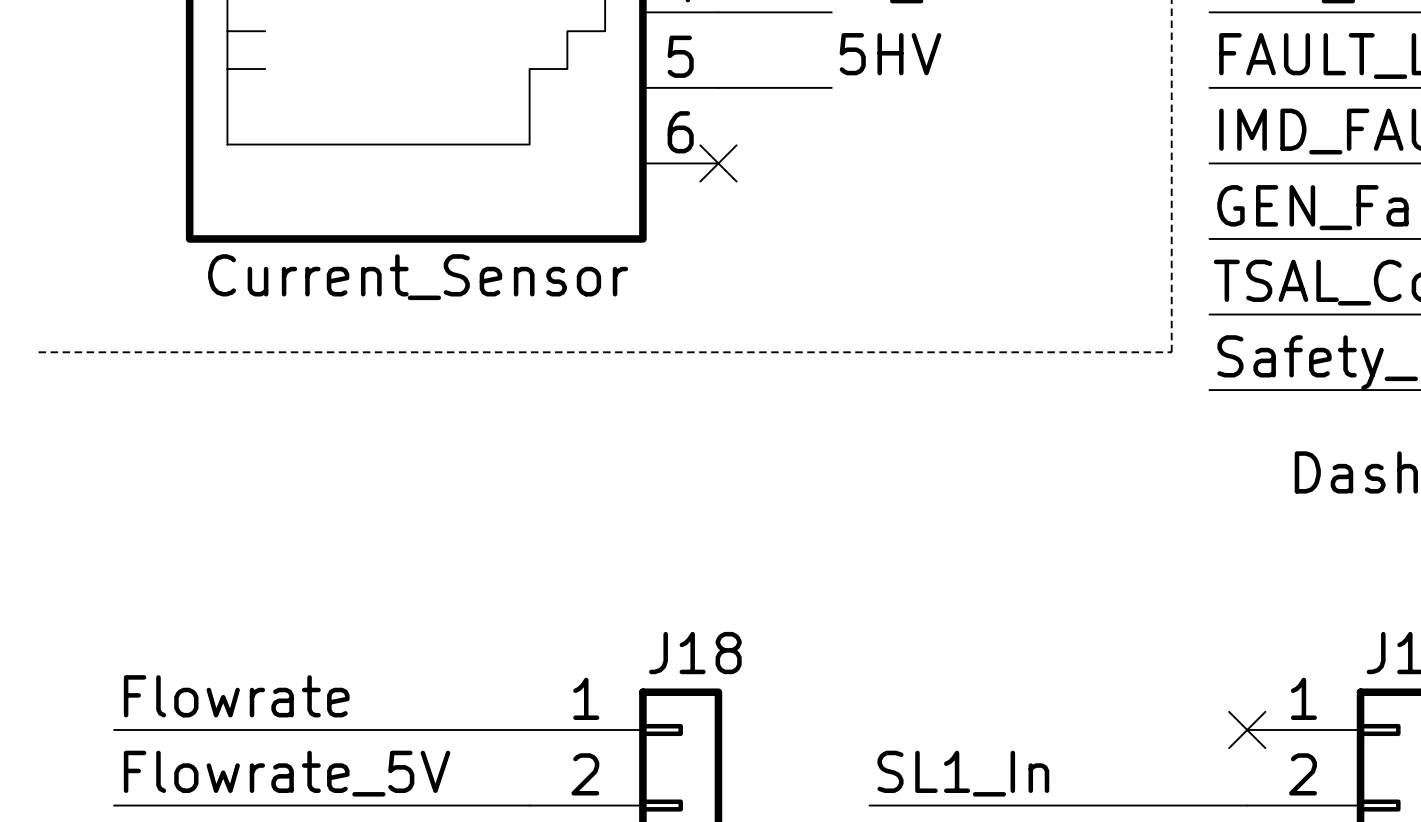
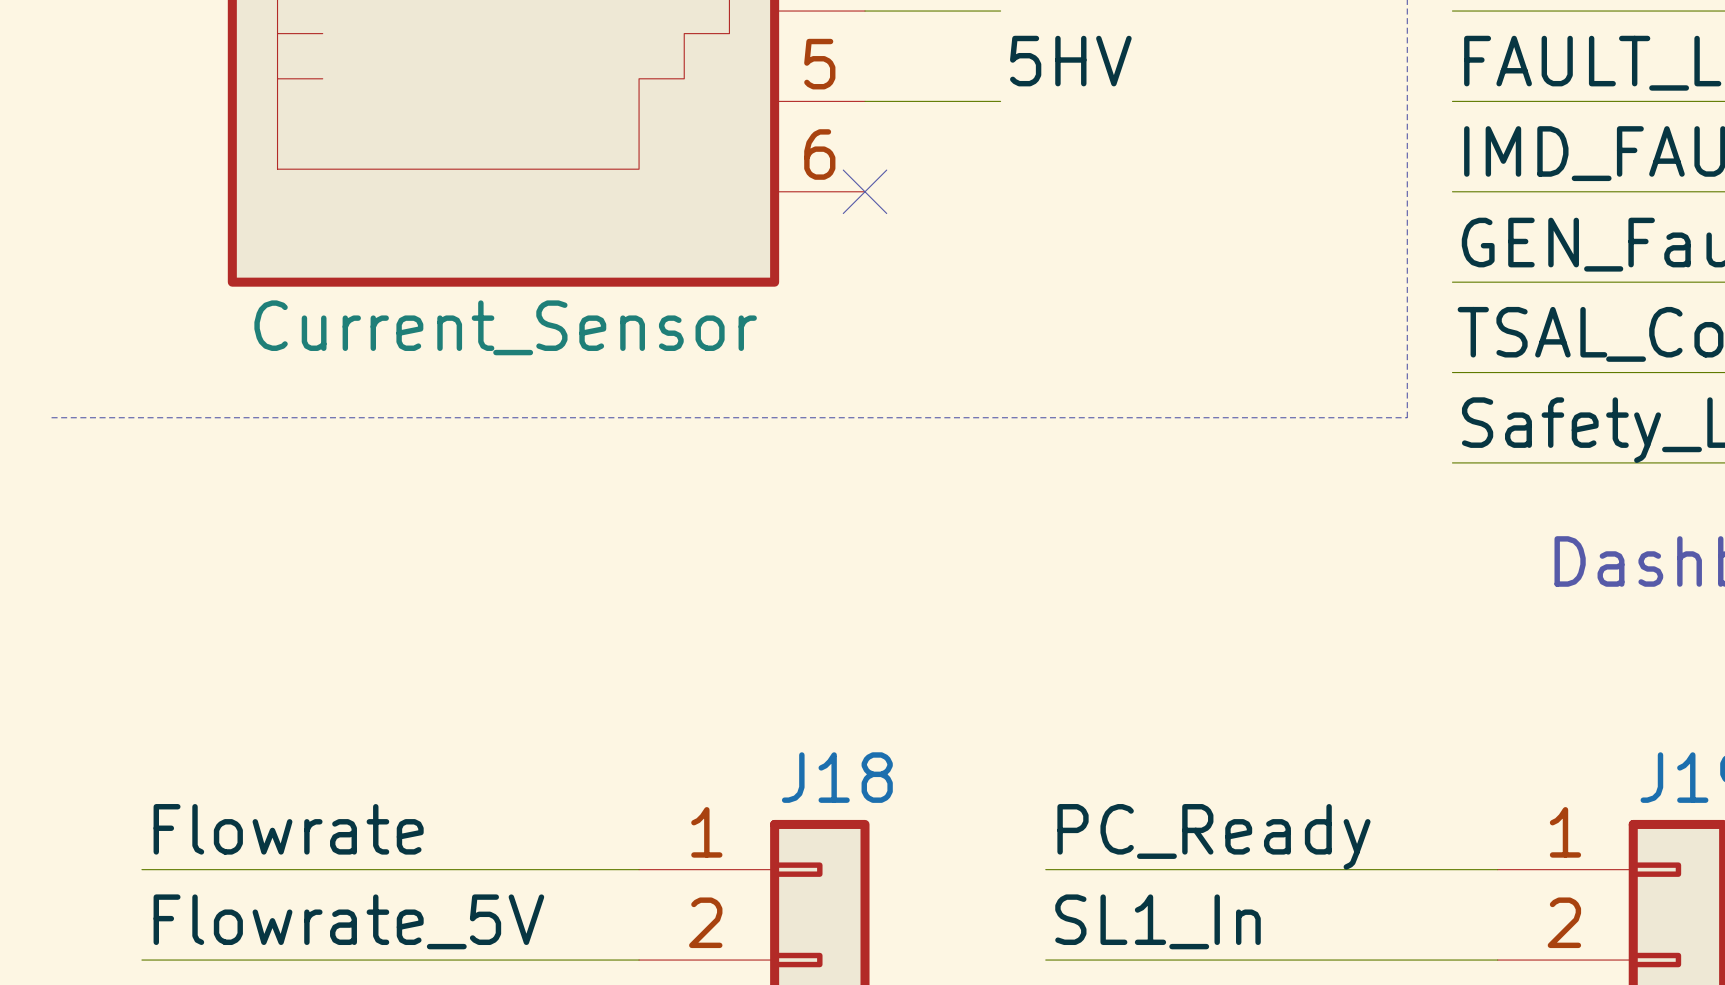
label: none -> PC_Ready (1213, 836)
wire: none -> (1045, 869) (1497, 869)
no-connect mark: (1247, 730) -> none

